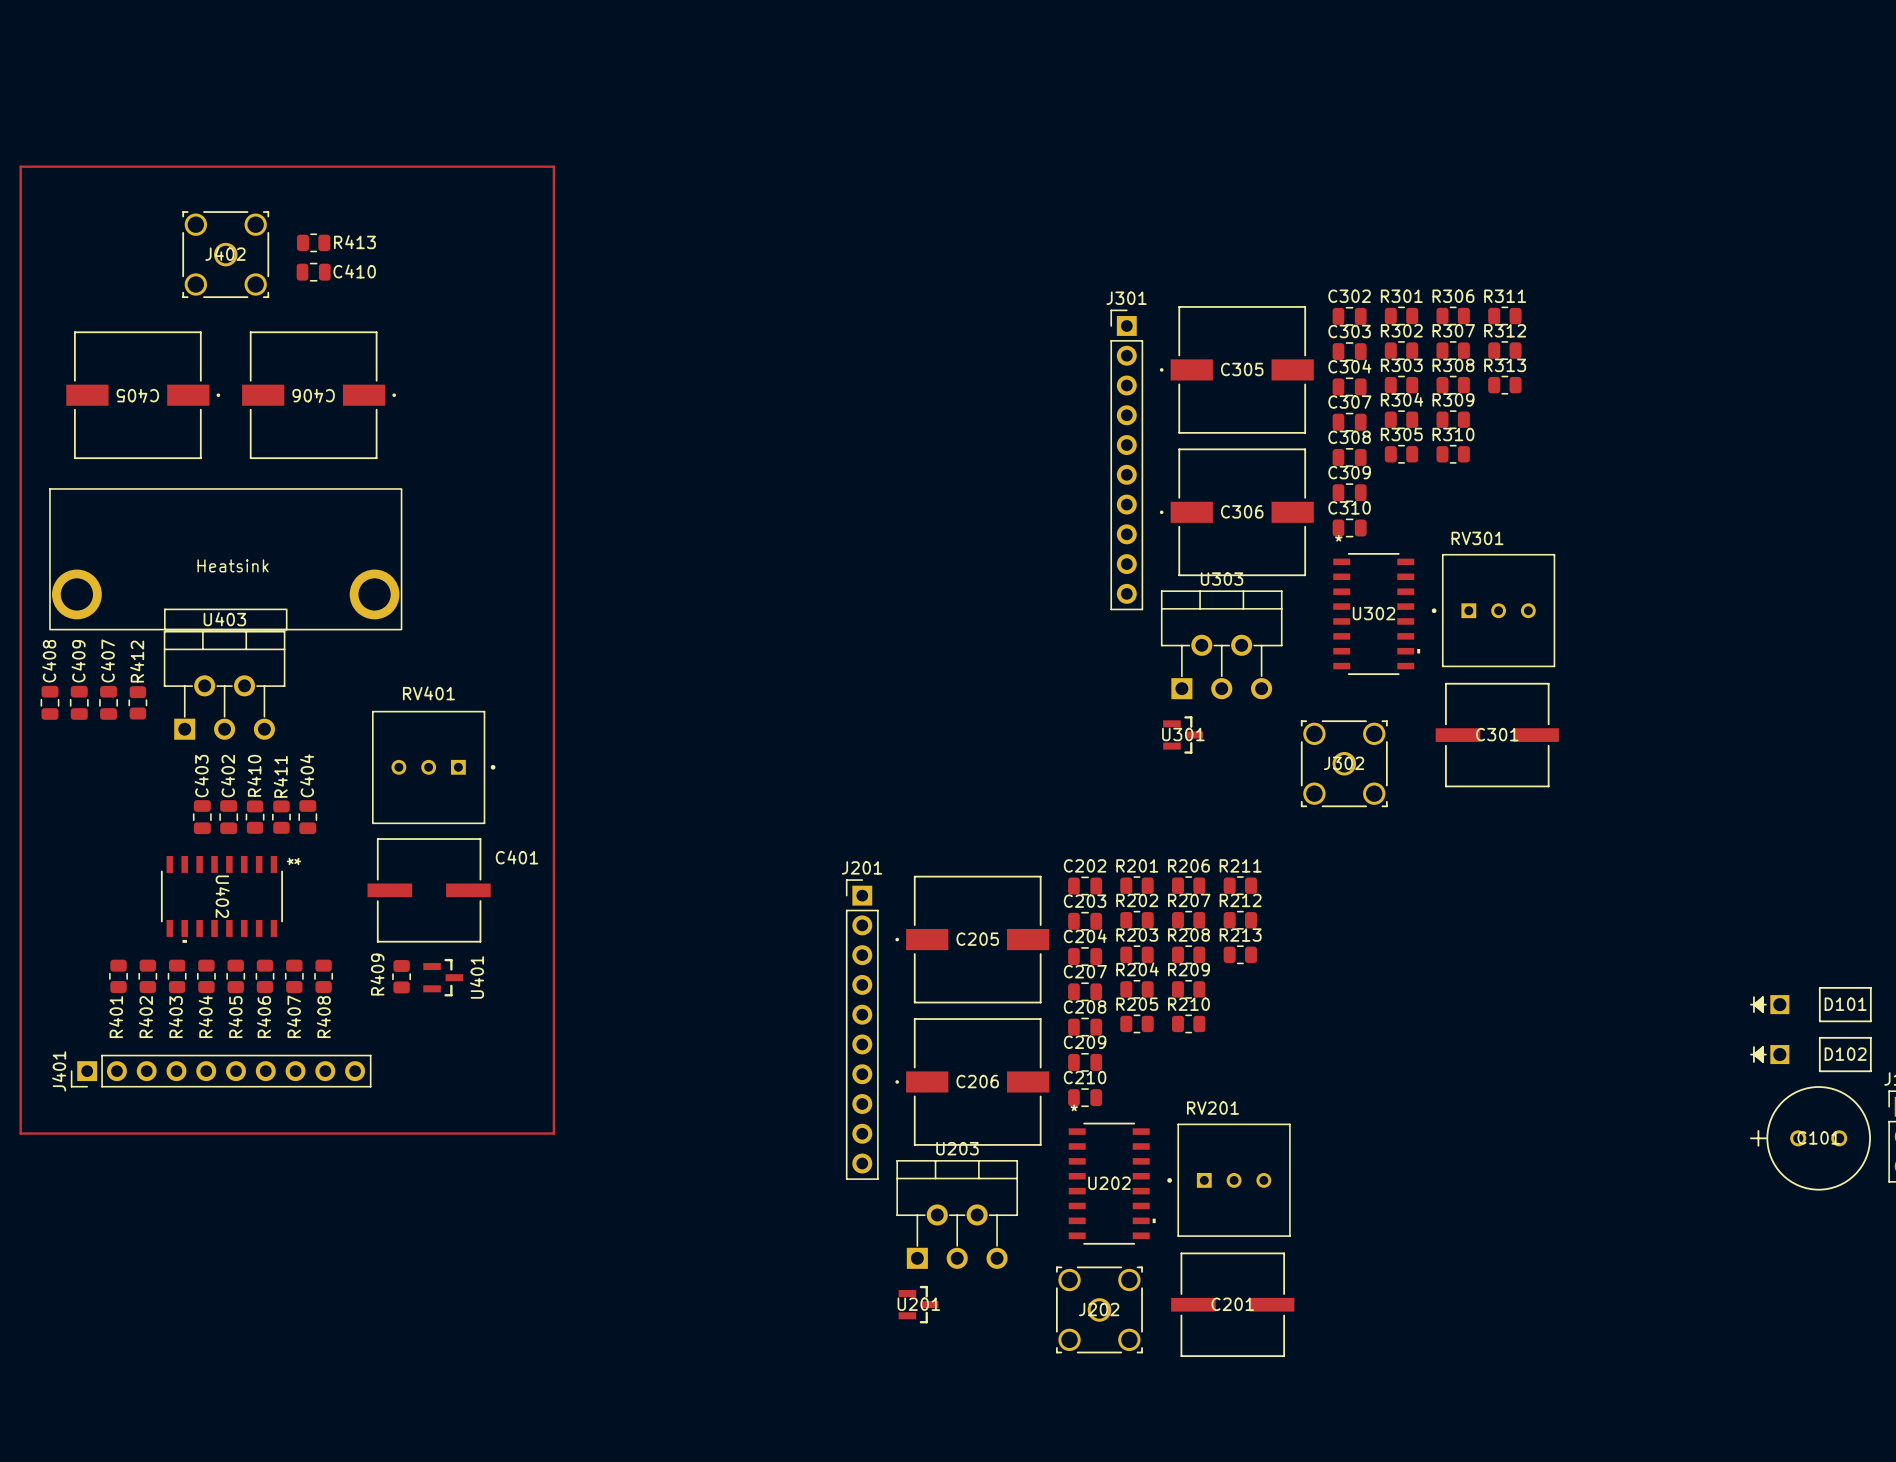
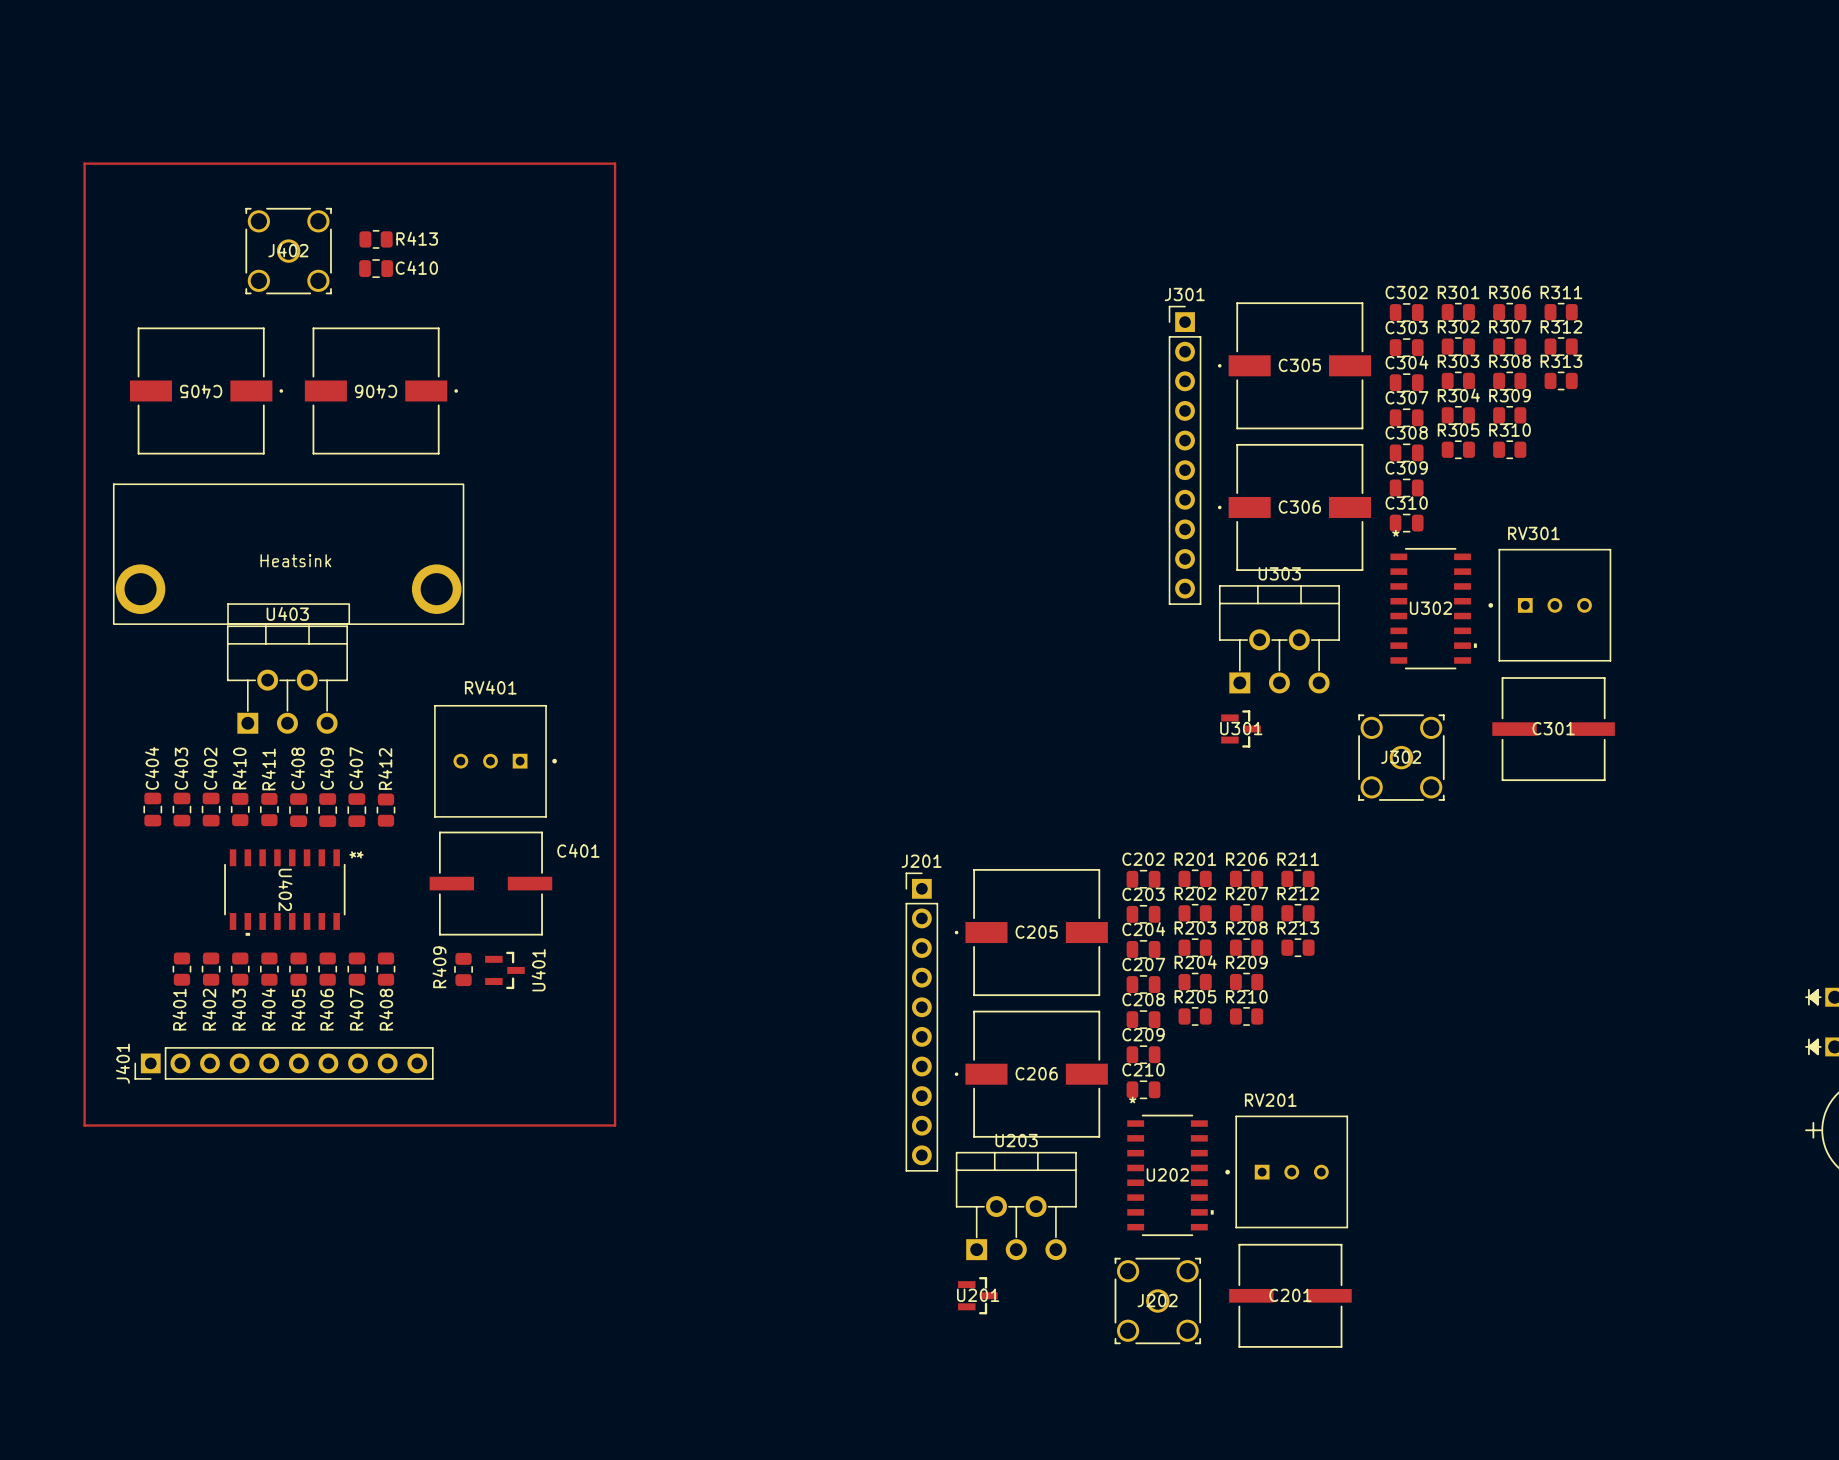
C408 position: (49, 702) -> (298, 810)
C409 position: (79, 702) -> (327, 810)
C407 position: (108, 702) -> (356, 810)
R412 position: (137, 702) -> (385, 810)
C403 position: (202, 817) -> (181, 809)
C402 position: (228, 817) -> (211, 809)
R410 position: (255, 817) -> (240, 809)
R411 position: (281, 817) -> (269, 809)
C404 position: (307, 817) -> (152, 809)

